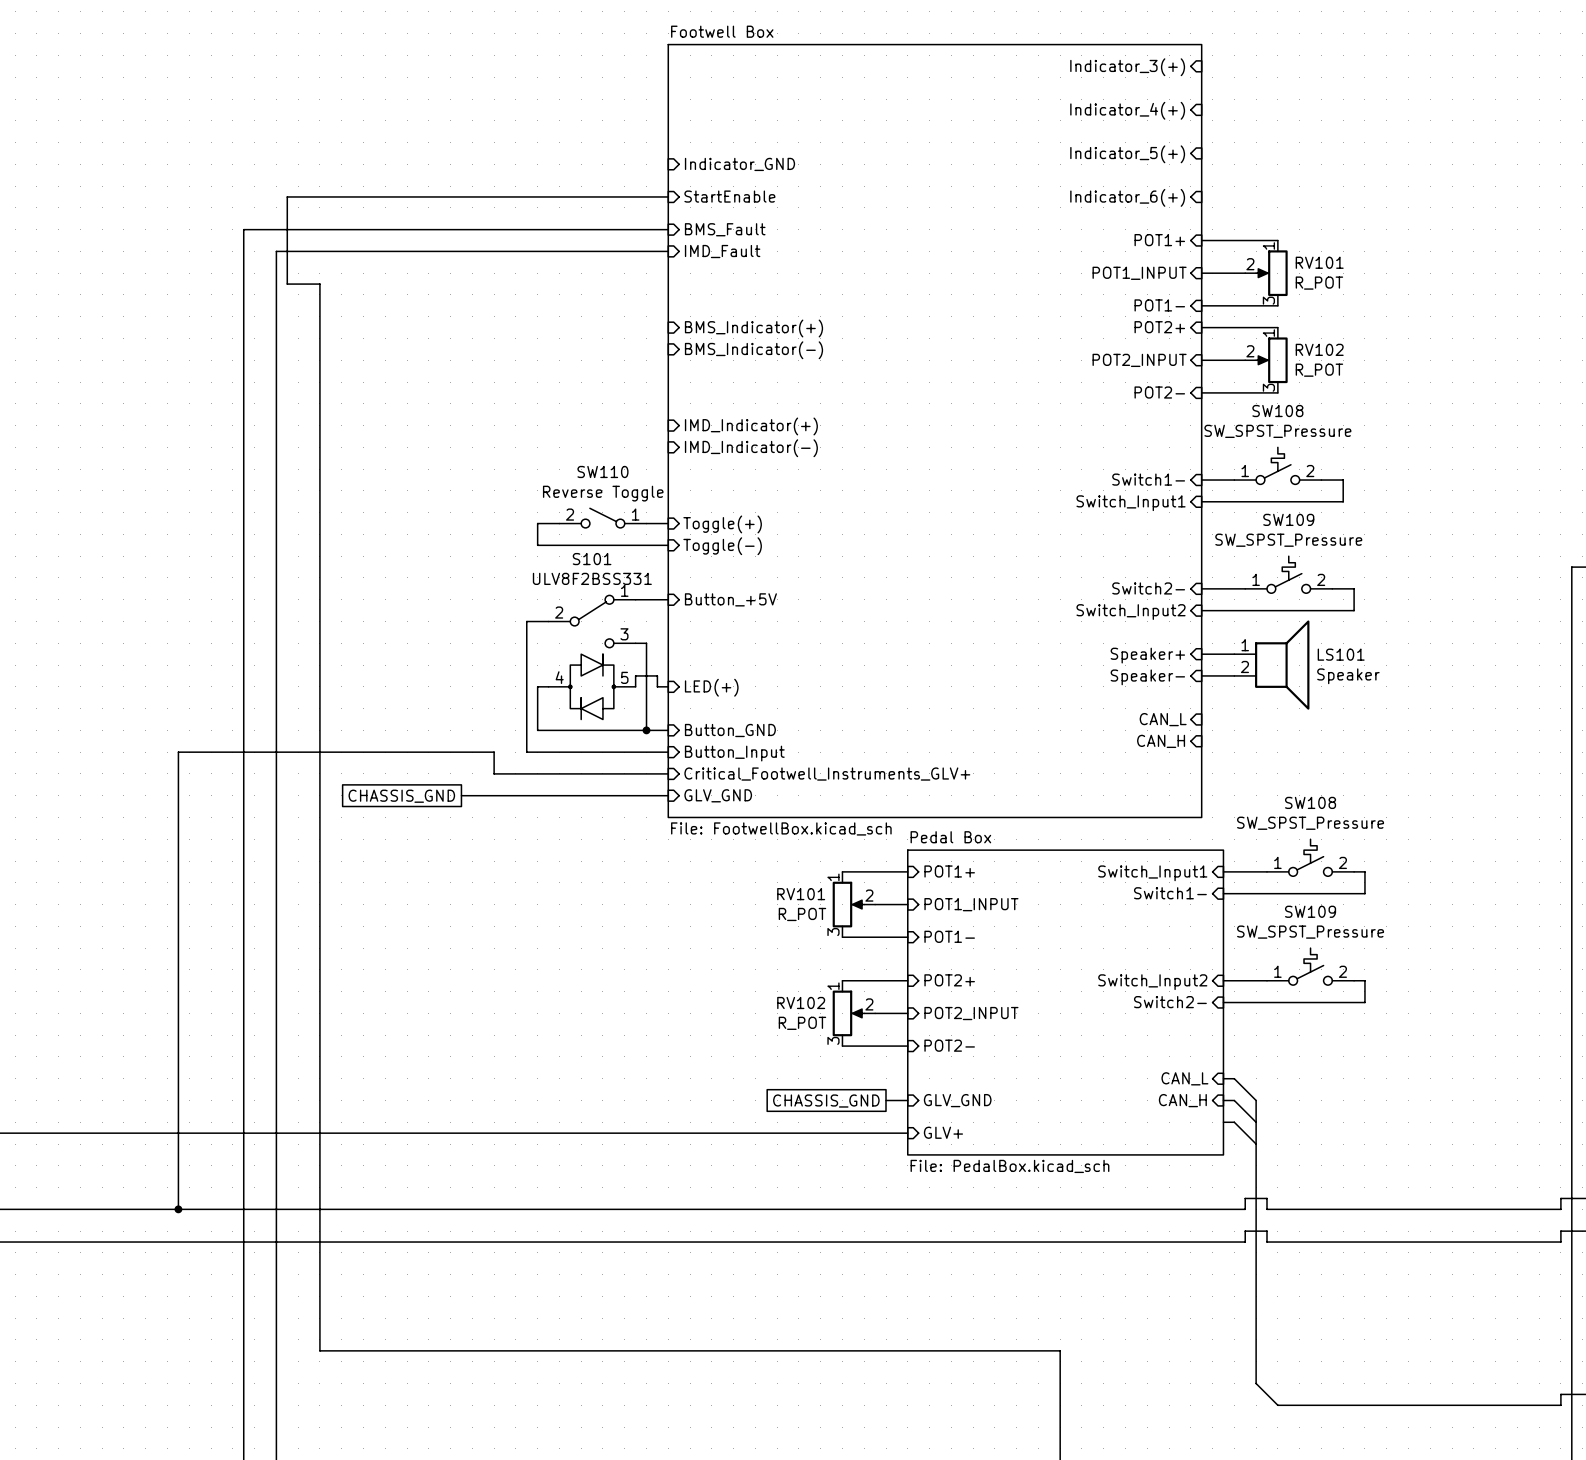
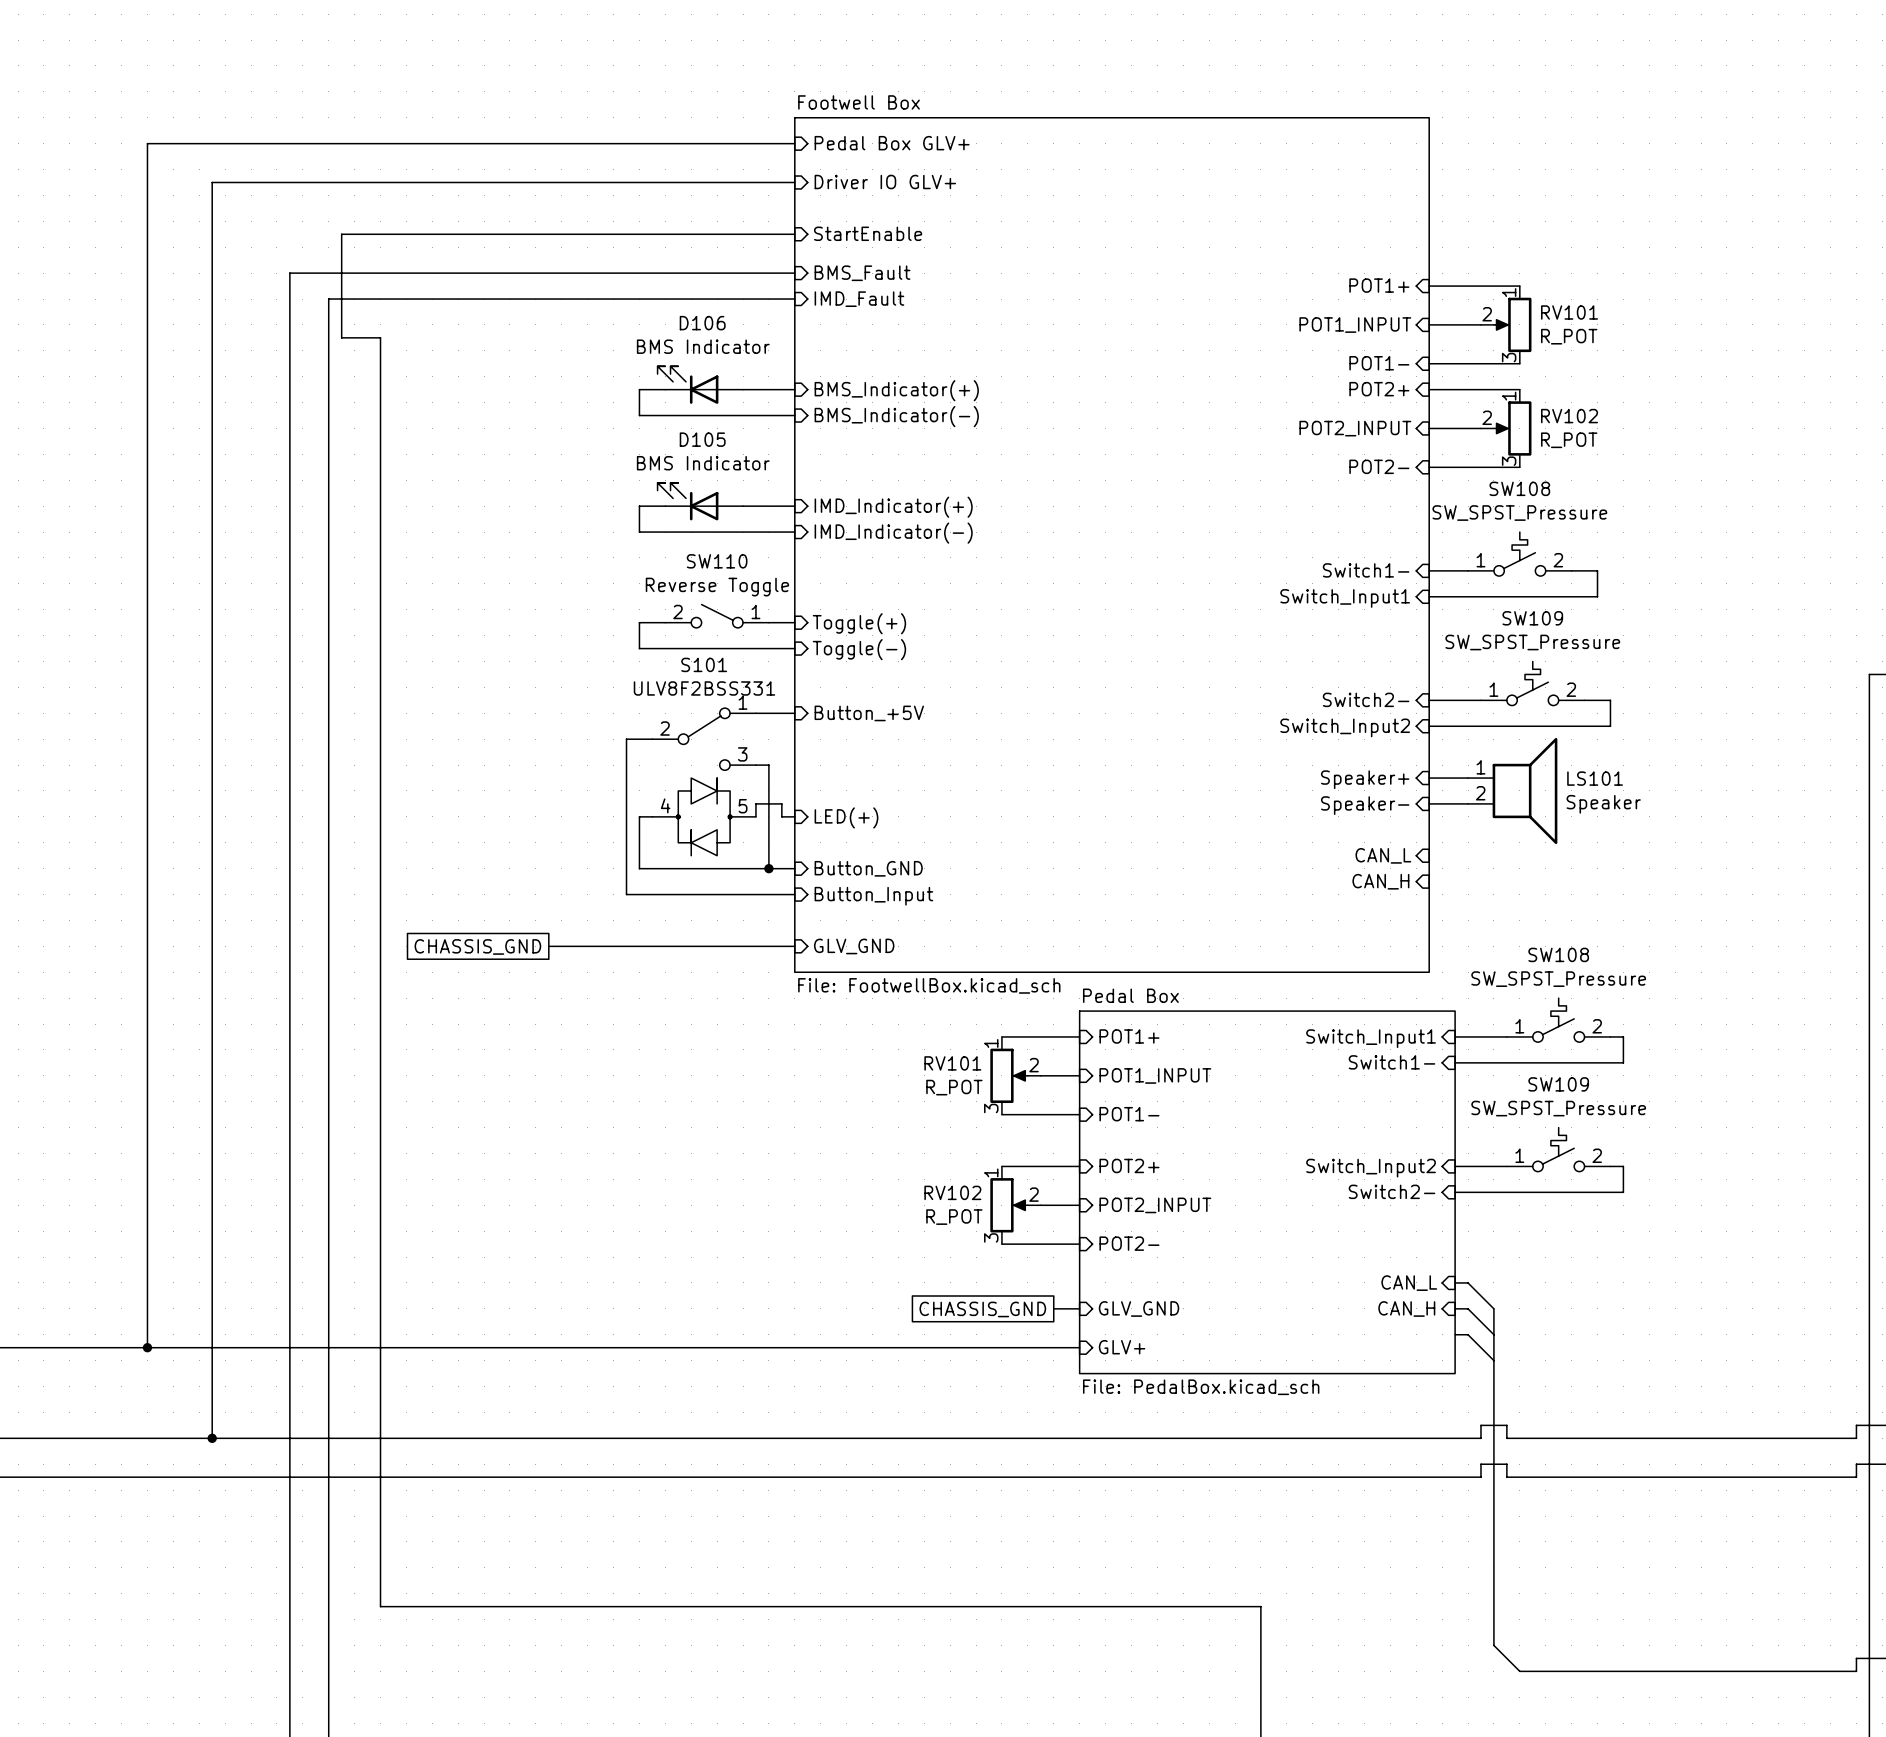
sheet pin: Indicator_3(+) (1127, 67) -> none
sheet pin: Indicator_4(+) (1127, 110) -> none
wire: none -> (794, 143) (147, 143) (147, 1347)
sheet pin: none -> Pedal Box GLV+ (892, 143)
sheet pin: none -> Driver IO GLV+ (885, 182)
sheet pin: Indicator_5(+) (1127, 154) -> none
sheet pin: Indicator_GND (739, 164) -> none
sheet pin: Indicator_6(+) (1127, 197) -> none
D106: none -> BMS Indicator (700, 385)
wire: none -> (665, 389) (639, 389) (639, 415) (794, 415)
wire: none -> (743, 389) (794, 389)
D105: none -> BMS Indicator (700, 501)
wire: none -> (665, 506) (639, 506) (639, 532) (794, 532)
wire: none -> (743, 506) (794, 506)
sheet Footwell Box: File: FootwellBox.kicad_sch (934, 431) -> none
sheet Footwell Box: none -> File: FootwellBox.kicad_sch (1112, 545)
wire: (178, 752) (494, 752) (494, 773) (668, 773) -> (212, 894) (212, 182) (794, 182)
sheet pin: Critical_Footwell_Instruments_GLV+ (827, 774) -> none
junction: none -> (147, 1347)

